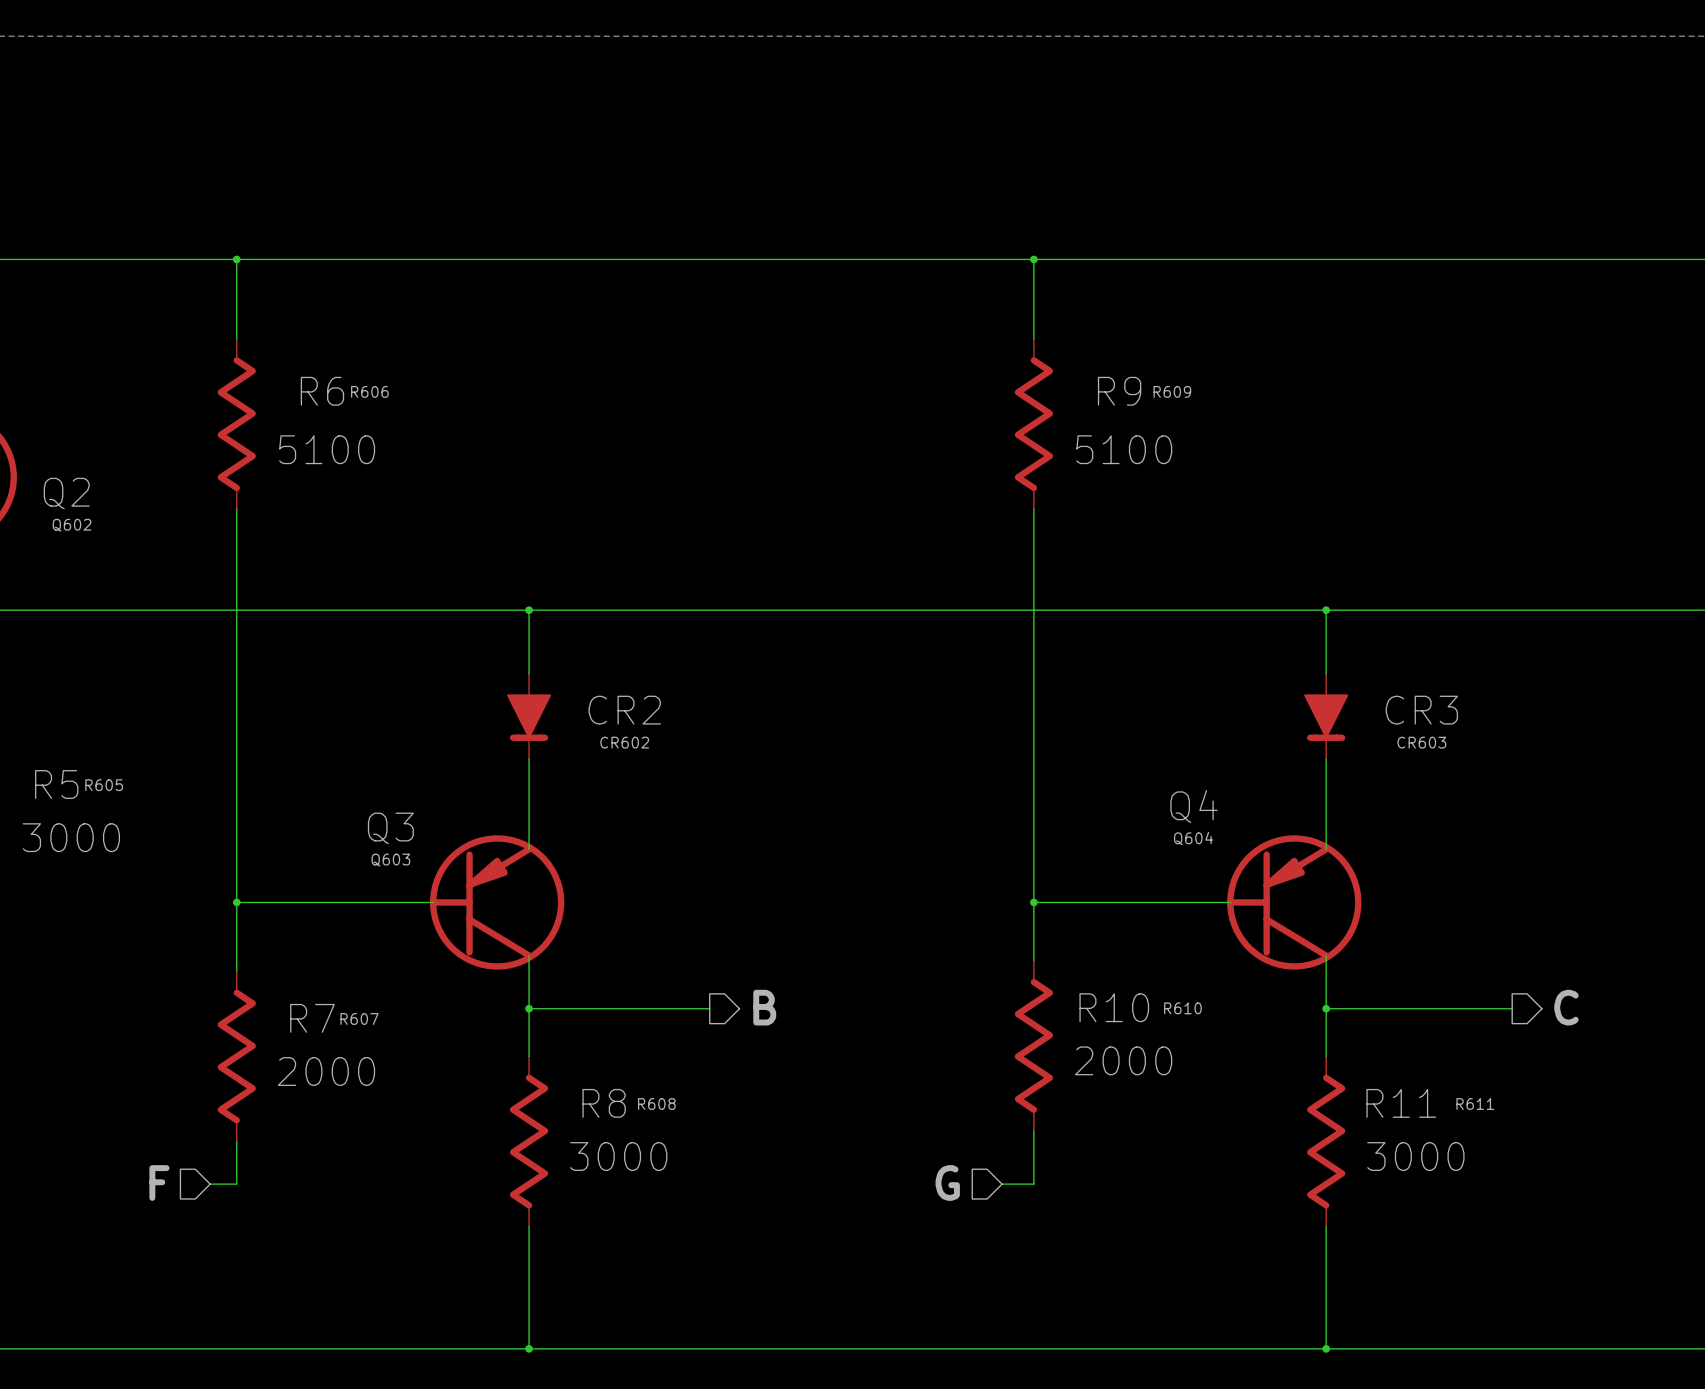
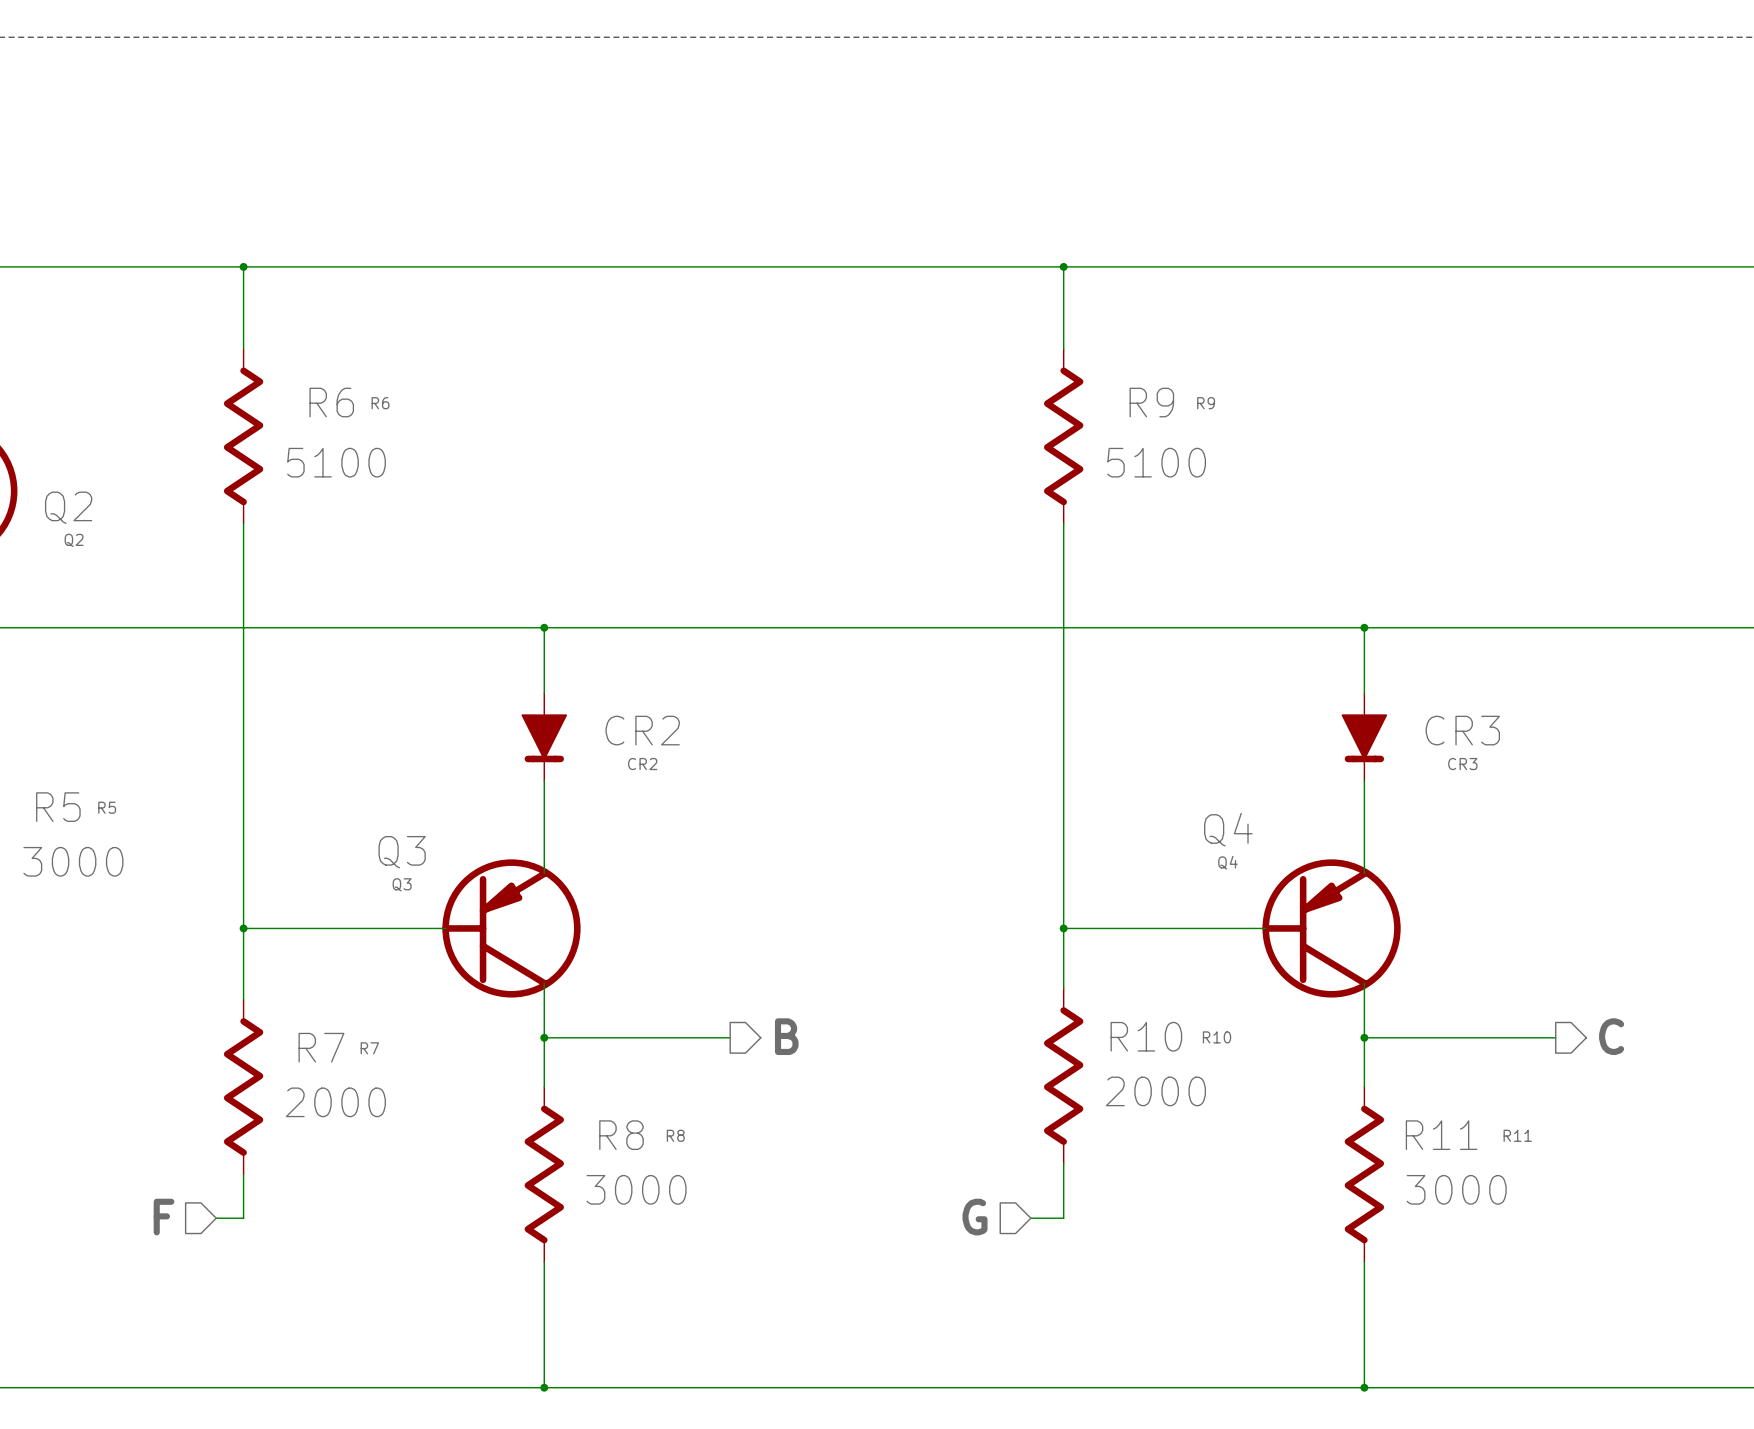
R606 name: R606 (369, 391) -> R6 (380, 403)
R609 name: R609 (1172, 391) -> R9 (1206, 403)
Q602 name: Q602 (72, 525) -> Q2 (74, 540)
CR602 name: CR602 (624, 742) -> CR2 (642, 764)
CR603 name: CR603 (1421, 742) -> CR3 (1462, 764)
R605 name: R605 (104, 785) -> R5 (107, 807)
Q604 name: Q604 (1193, 838) -> Q4 (1227, 862)
Q603 name: Q603 (390, 860) -> Q3 (402, 884)
R610 name: R610 (1182, 1008) -> R10 (1217, 1037)
R607 name: R607 (359, 1018) -> R7 (369, 1048)
R608 name: R608 (656, 1104) -> R8 (675, 1135)
R611 name: R611 (1475, 1104) -> R11 (1517, 1135)

